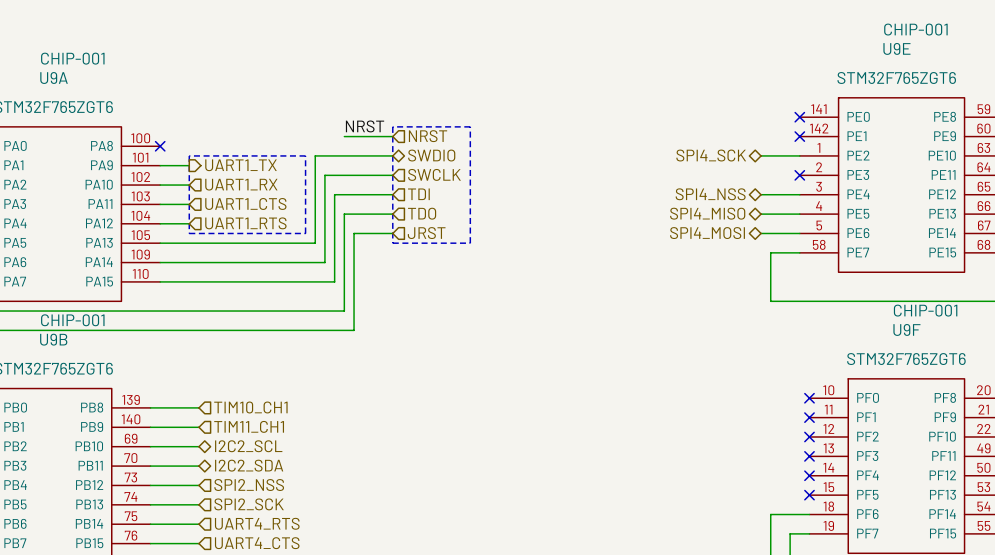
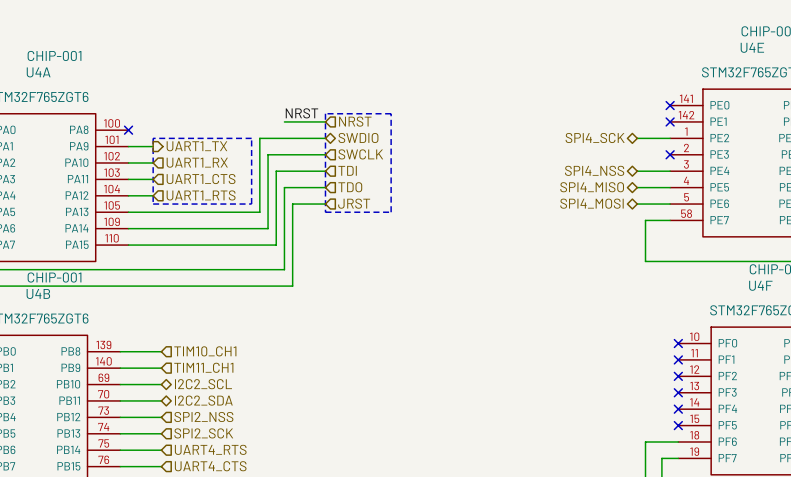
U9E name: U9E (896, 48) -> U4E (752, 47)
U9A name: U9A (54, 78) -> U4A (38, 72)
U9F name: U9F (906, 329) -> U4F (760, 285)
U9B name: U9B (53, 339) -> U4B (38, 293)

